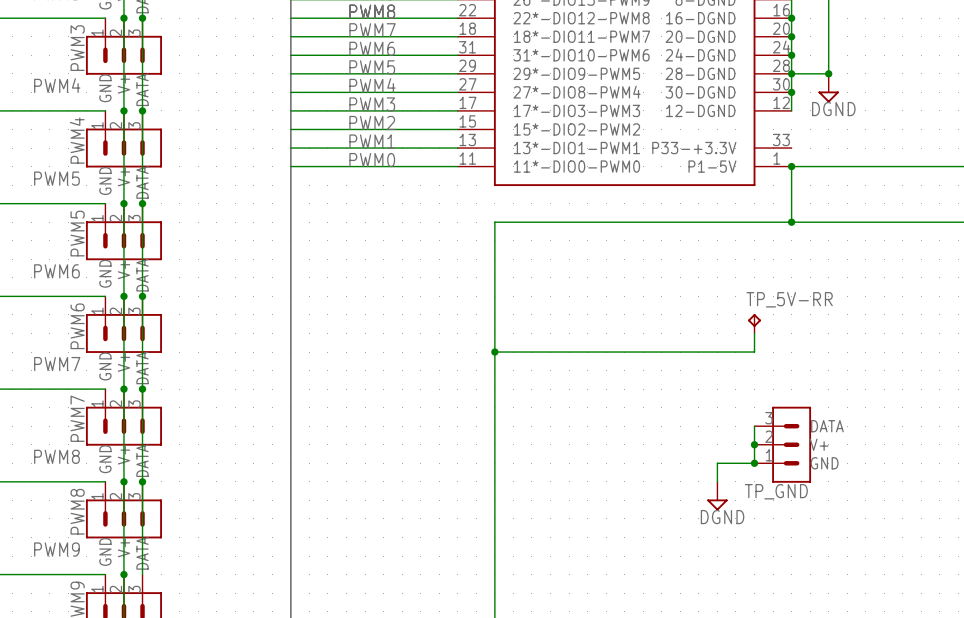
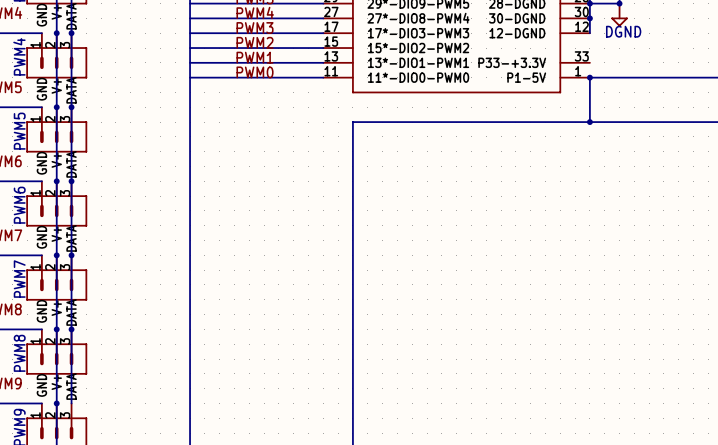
TP_5V-RR: (754, 323) -> none
wire: (754, 333) (754, 352) (494, 352) -> none
junction: (494, 352) -> none
wire: (754, 426) (754, 463) (717, 463) (717, 481) -> none
junction: (754, 444) -> none
TP_GND: (782, 444) -> none
junction: (754, 463) -> none
power symbol: DGND (717, 496) -> none

